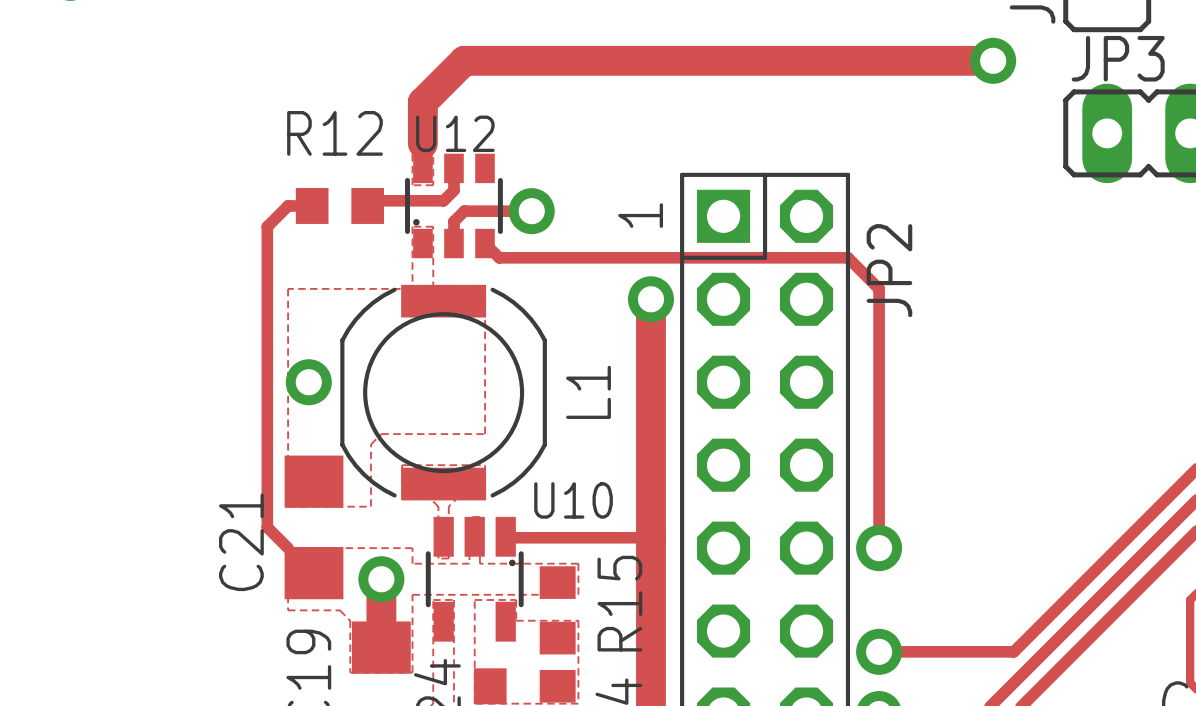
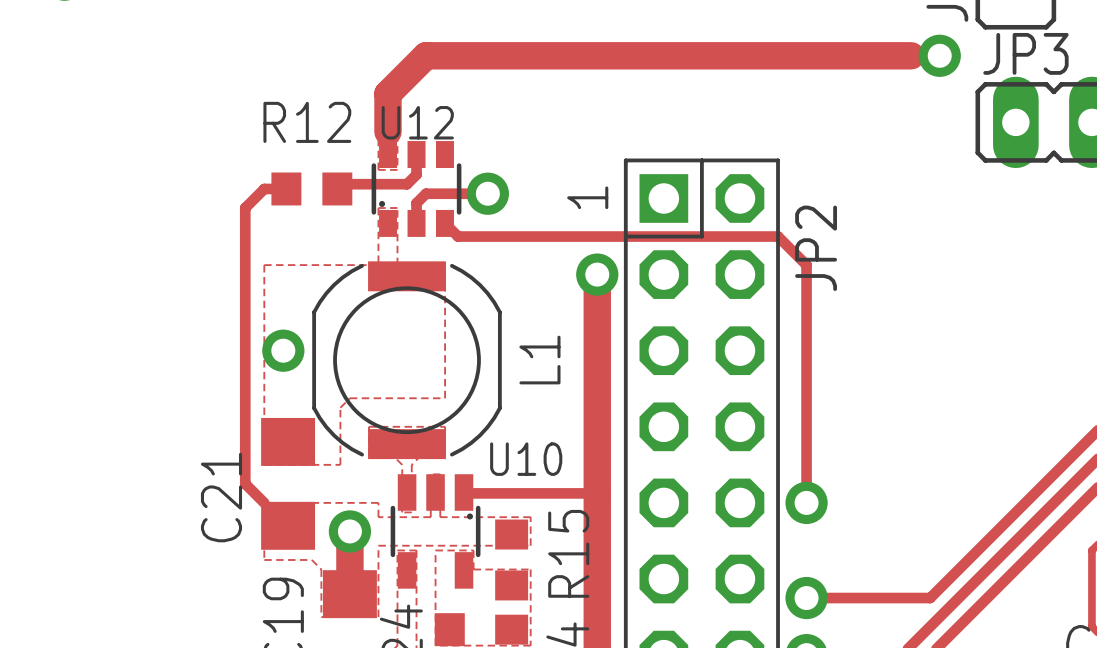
via position: (993, 60) -> (939, 55)

